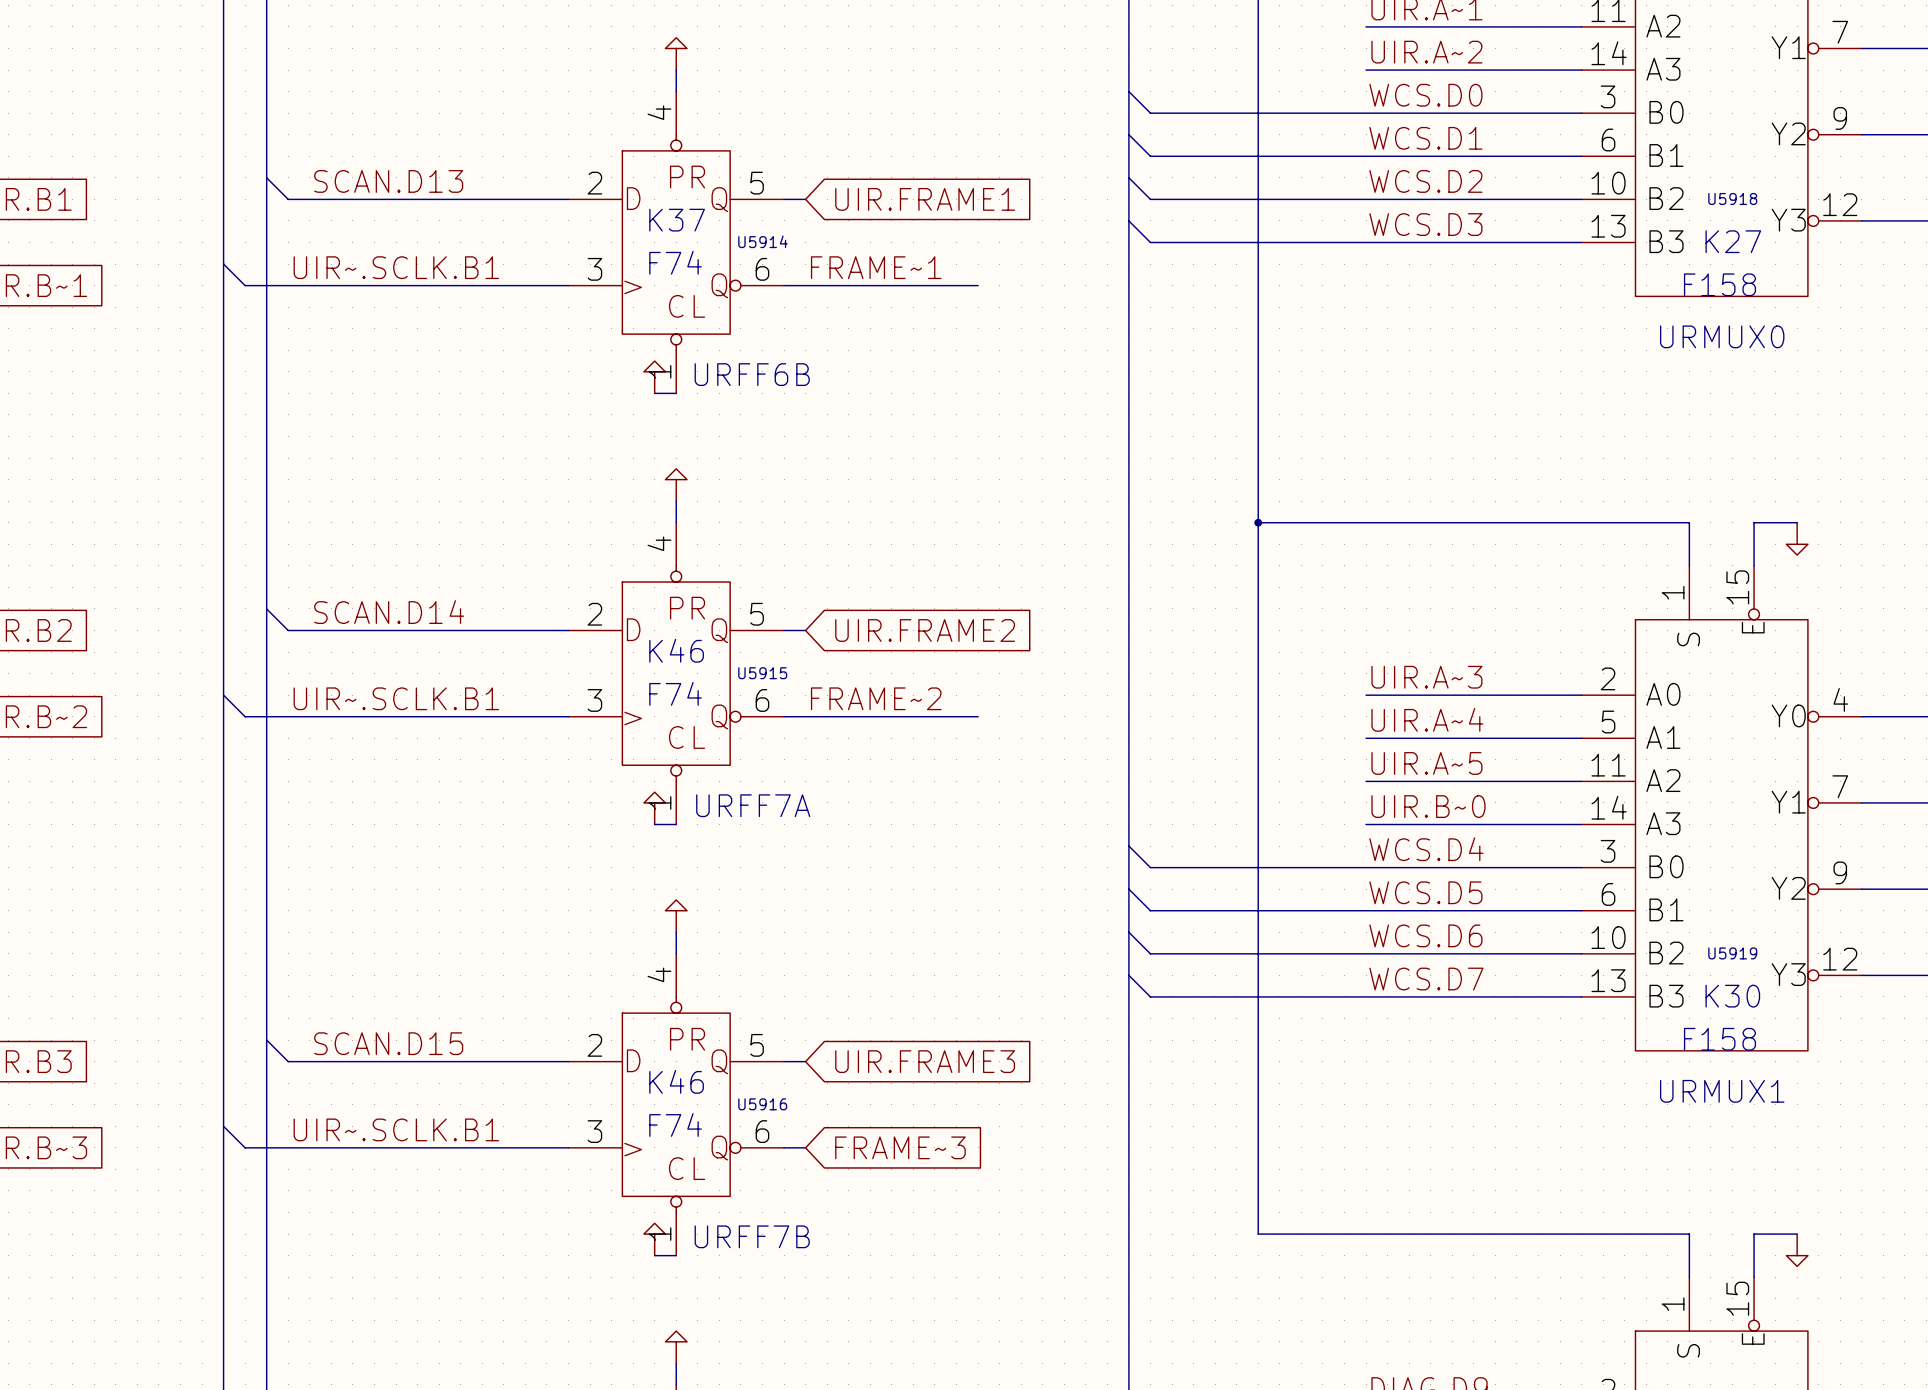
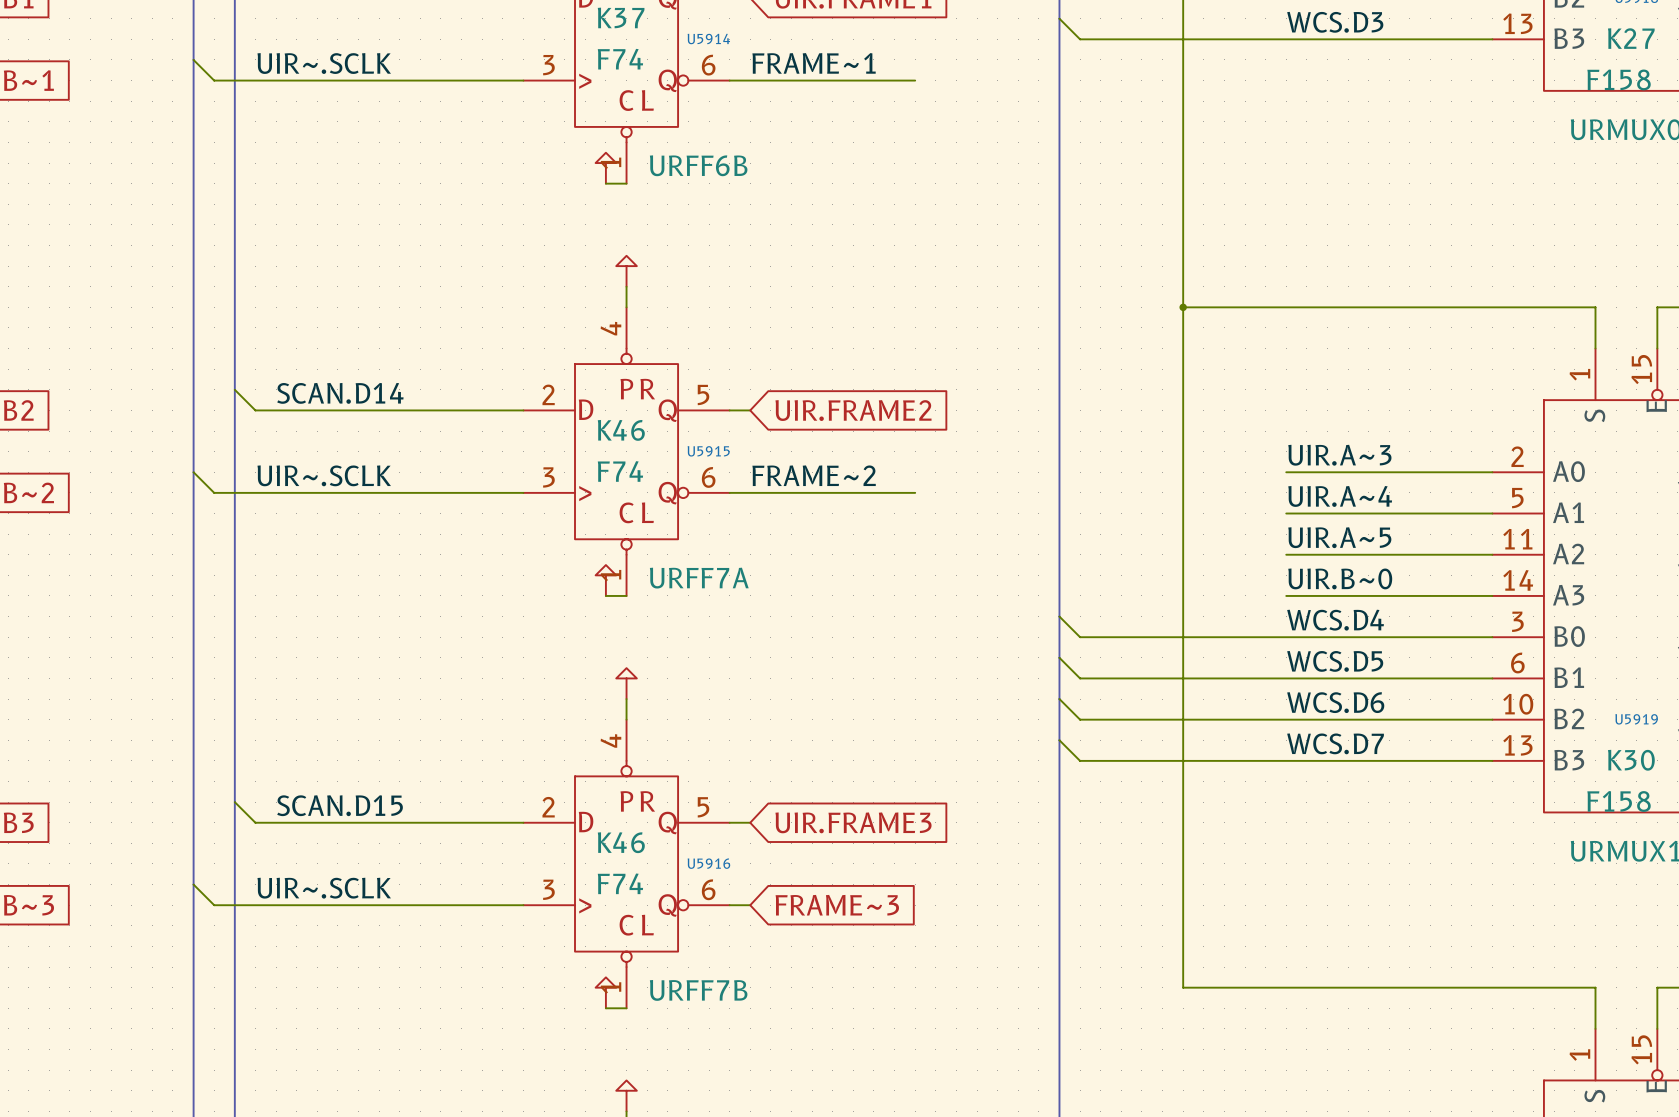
label: UIR~.SCLK.B1 (396, 267) -> UIR~.SCLK (324, 63)
label: UIR~.SCLK.B1 (396, 698) -> UIR~.SCLK (324, 475)
label: UIR~.SCLK.B1 (396, 1129) -> UIR~.SCLK (324, 888)

